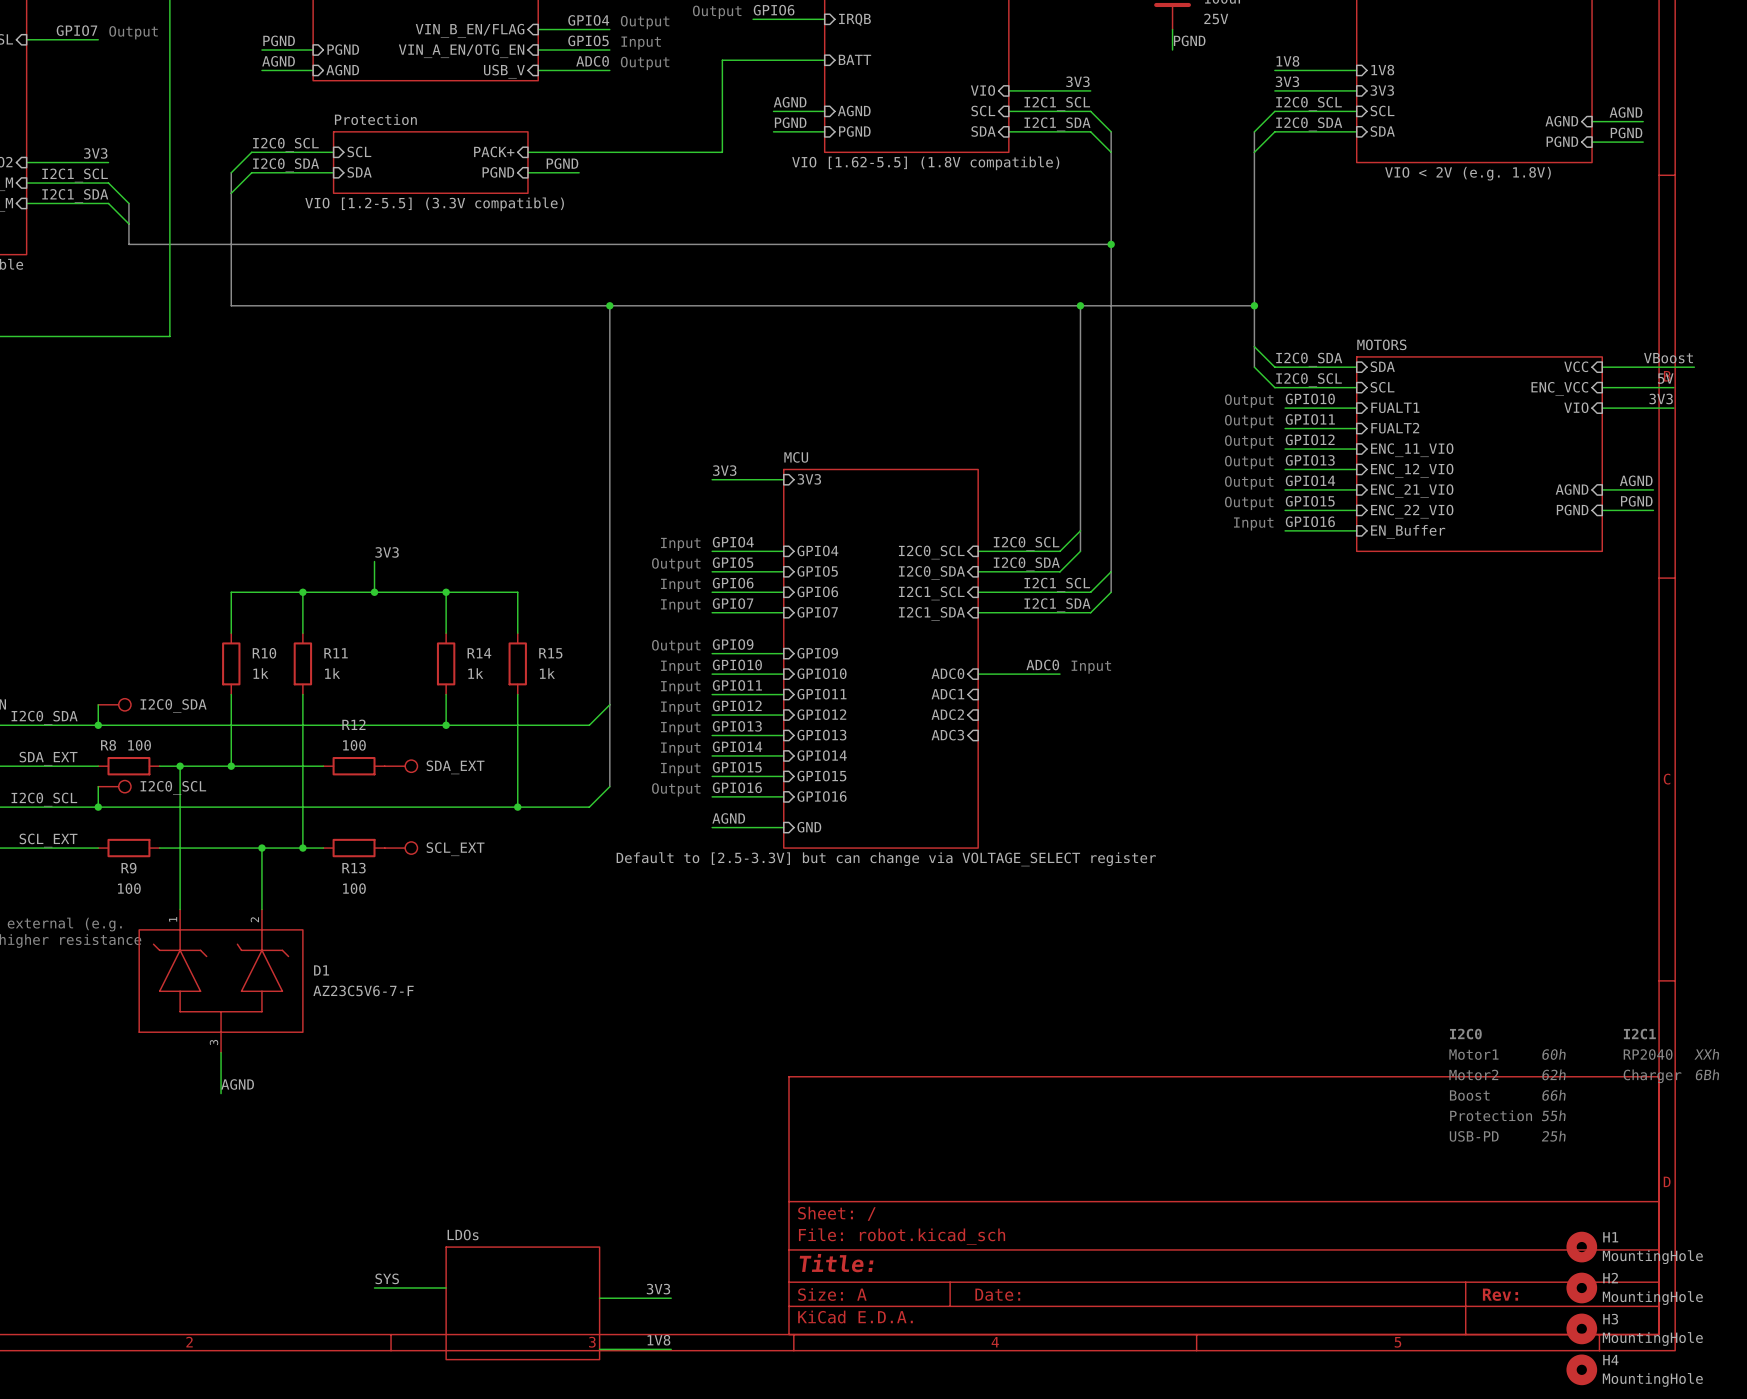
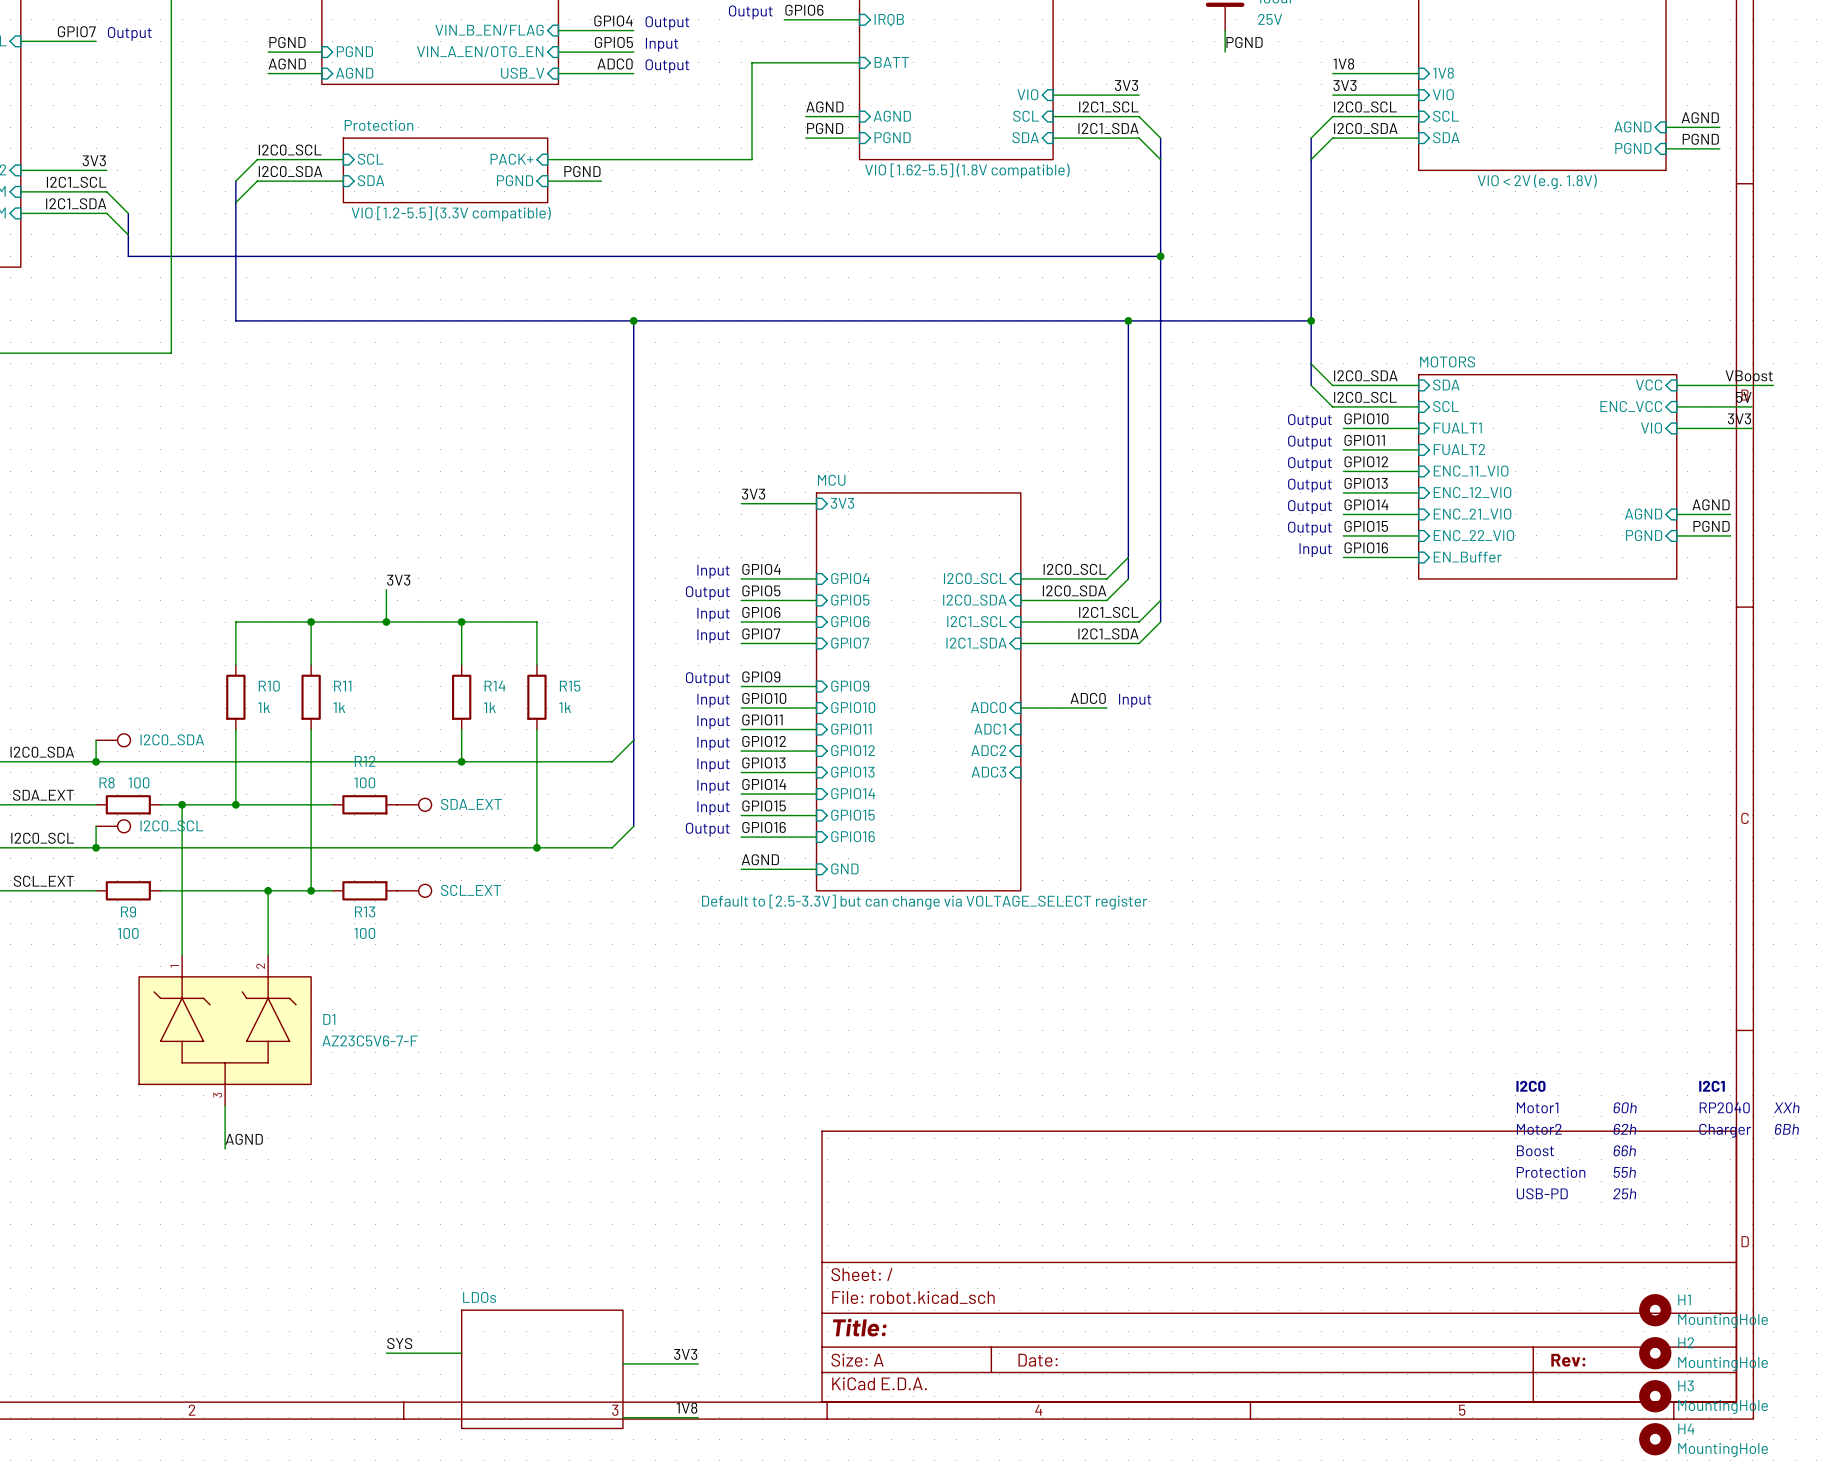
sheet pin: 3V3 (1382, 90) -> VIO (1443, 94)

